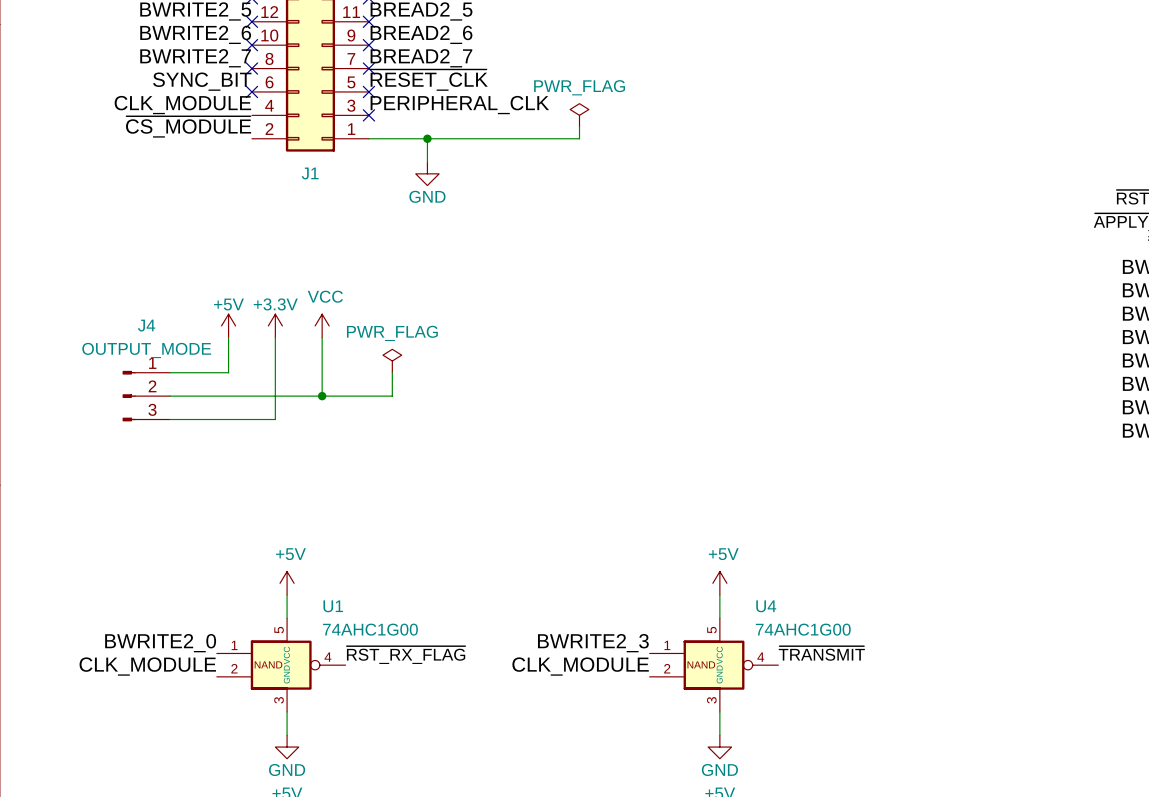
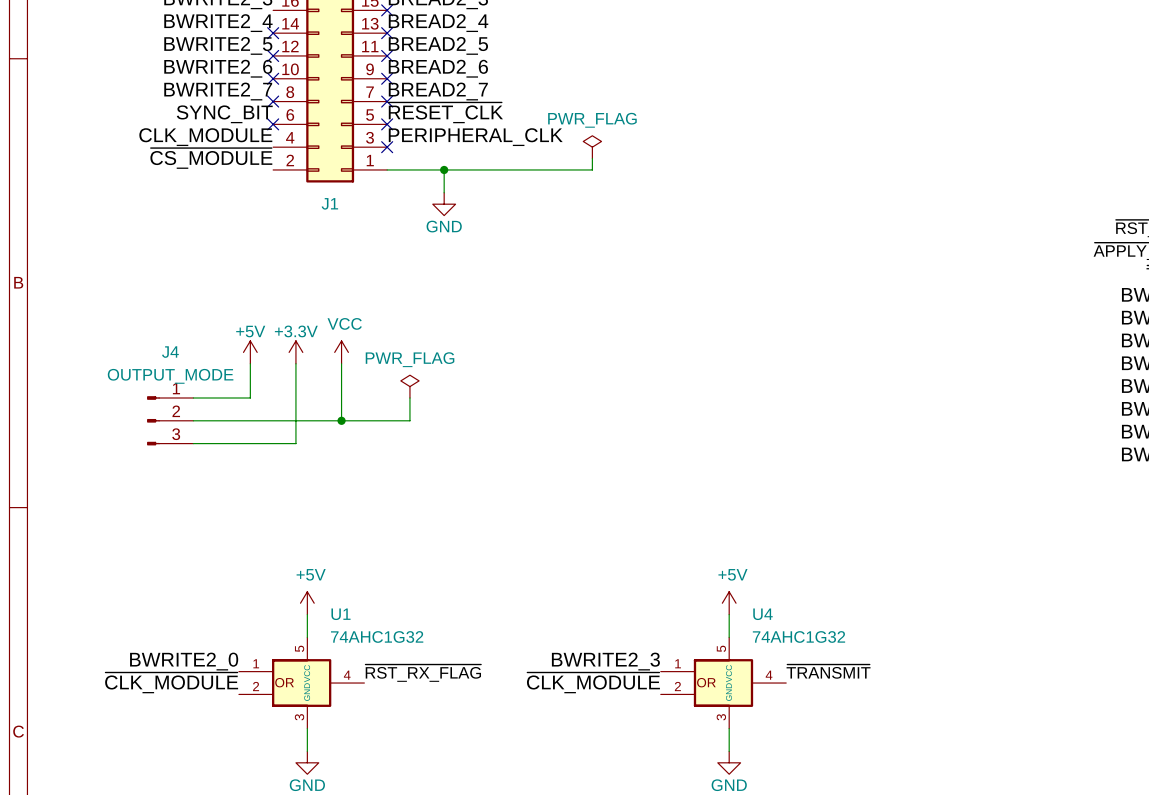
U1 symbol: [216, 618, 346, 712] -> [238, 637, 365, 729]
U4 symbol: [649, 618, 779, 712] -> [660, 637, 787, 729]
U1 value: 74AHC1G00 (370, 629) -> 74AHC1G32 (377, 636)
U4 value: 74AHC1G00 (803, 629) -> 74AHC1G32 (798, 636)
label: CLK_MODULE (147, 666) -> ~{CLK_MODULE} (171, 682)
label: CLK_MODULE (580, 666) -> ~{CLK_MODULE} (593, 682)

